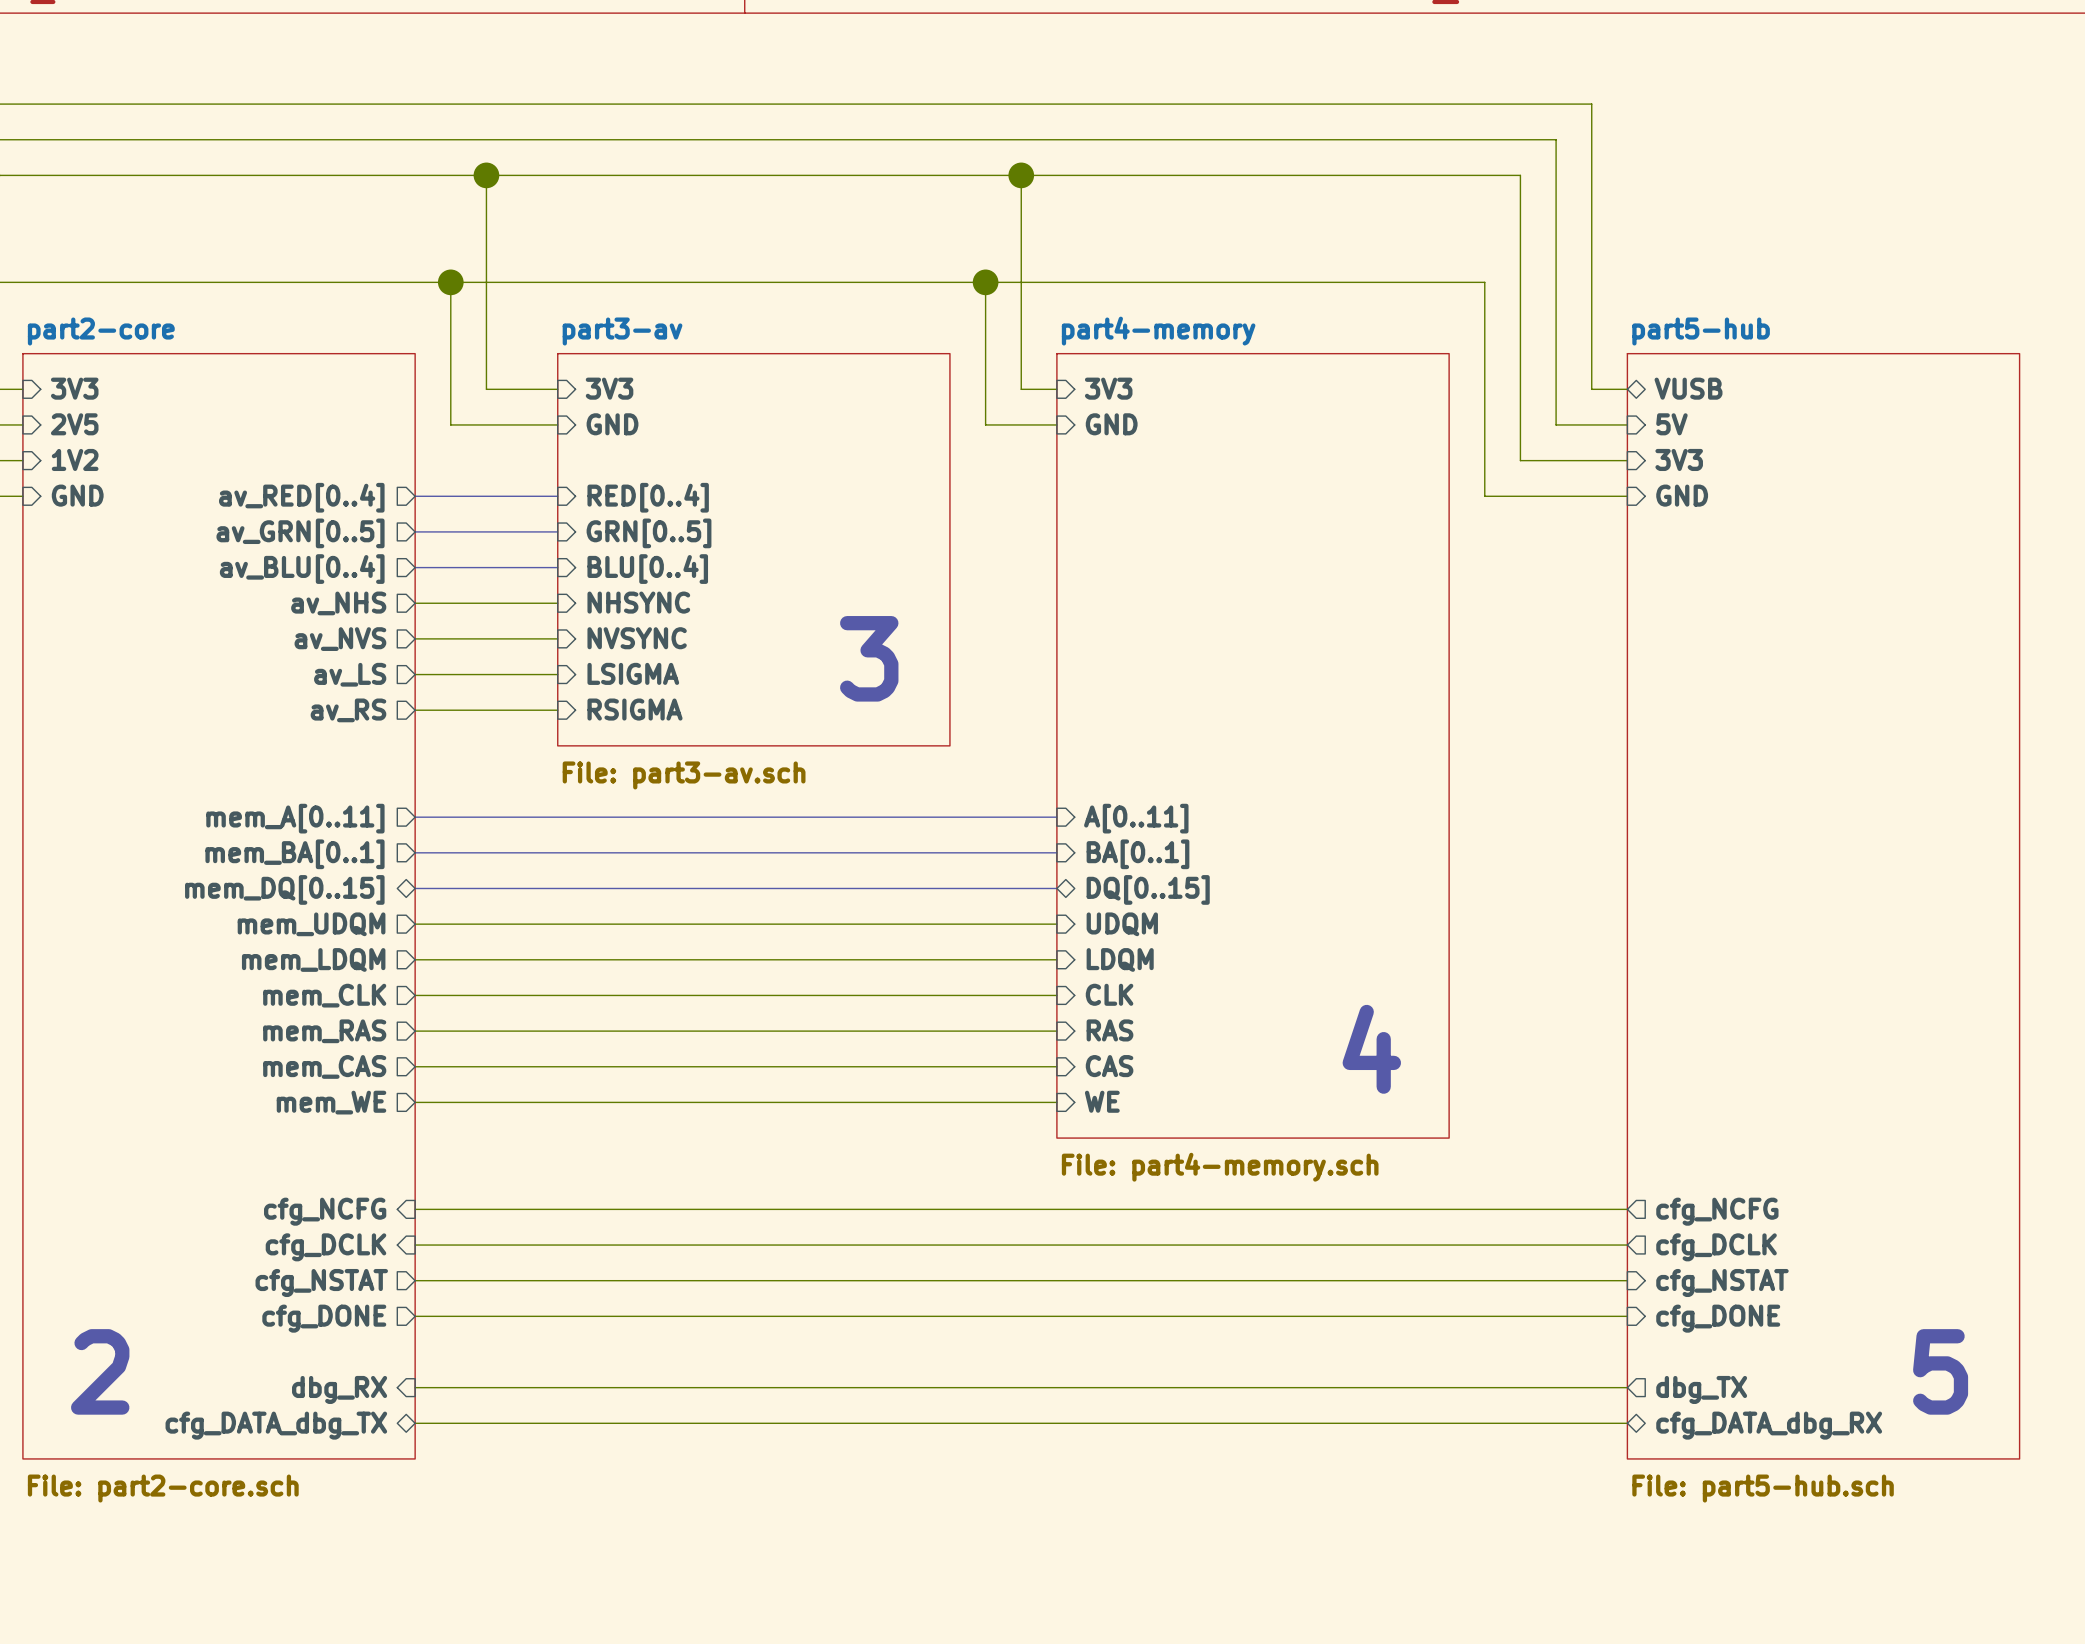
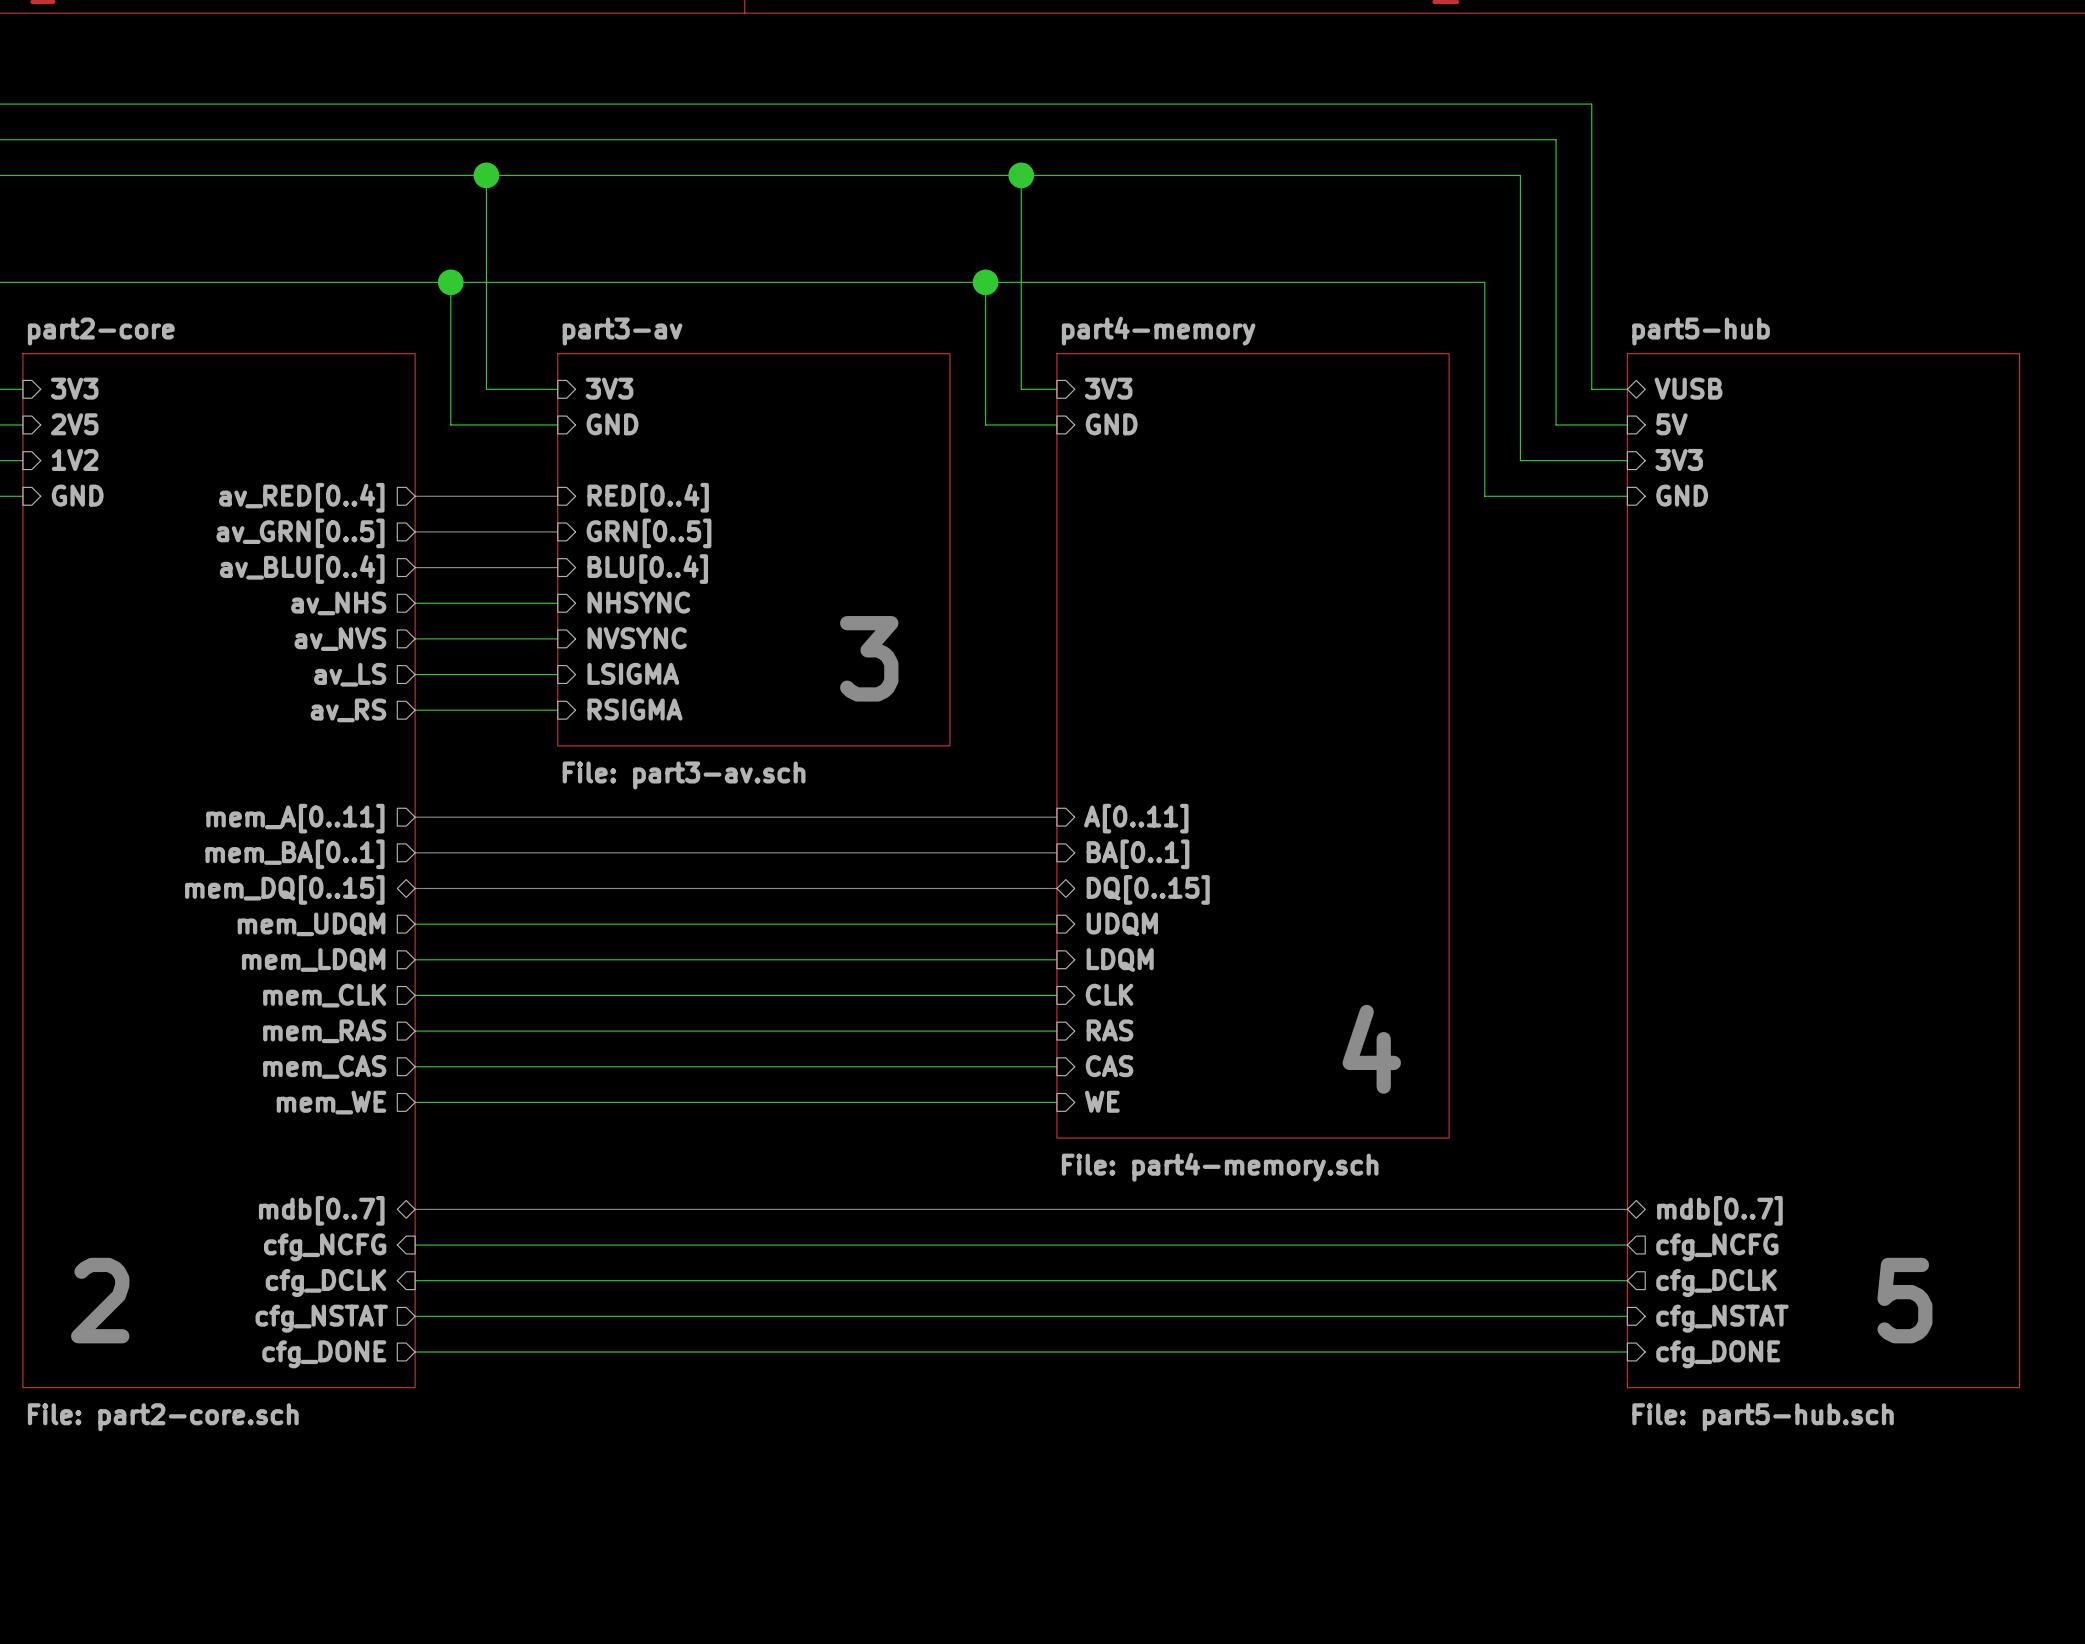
sheet part2-core shape: [22, 353, 416, 1459] -> [22, 353, 416, 1388]
sheet part5-hub shape: [1627, 353, 2020, 1459] -> [1627, 353, 2020, 1388]
bus: none -> (415, 1209) (1627, 1209)
sheet pin shape: input (325, 1211) -> bidirectional (321, 1210)
sheet pin: cfg_NCFG (325, 1211) -> mdb[0..7] (321, 1210)
sheet pin shape: output (1717, 1211) -> bidirectional (1719, 1210)
sheet pin: cfg_NCFG (1717, 1211) -> mdb[0..7] (1719, 1210)
sheet pin: cfg_DCLK (325, 1247) -> cfg_NCFG (325, 1247)
sheet pin: cfg_DCLK (1716, 1247) -> cfg_NCFG (1717, 1247)
sheet pin shape: output (321, 1282) -> input (325, 1282)
sheet pin: cfg_NSTAT (321, 1282) -> cfg_DCLK (325, 1282)
sheet pin shape: input (1722, 1282) -> output (1716, 1282)
sheet pin: cfg_NSTAT (1722, 1282) -> cfg_DCLK (1716, 1282)
sheet pin: cfg_DONE (324, 1318) -> cfg_NSTAT (321, 1318)
sheet pin: cfg_DONE (1718, 1318) -> cfg_NSTAT (1722, 1318)
sheet pin: none -> cfg_DONE (324, 1354)
sheet pin: none -> cfg_DONE (1718, 1354)
text position: 2 (100, 1371) -> 2 (100, 1300)
text position: 5 (1940, 1371) -> 5 (1904, 1300)
wire: (415, 1387) (1627, 1387) -> (415, 1351) (1627, 1351)
sheet pin: dbg_RX (339, 1389) -> none
sheet pin: dbg_TX (1701, 1389) -> none
wire: (415, 1423) (1627, 1423) -> none
sheet pin: cfg_DATA_dbg_TX (276, 1425) -> none
sheet pin: cfg_DATA_dbg_RX (1769, 1425) -> none

